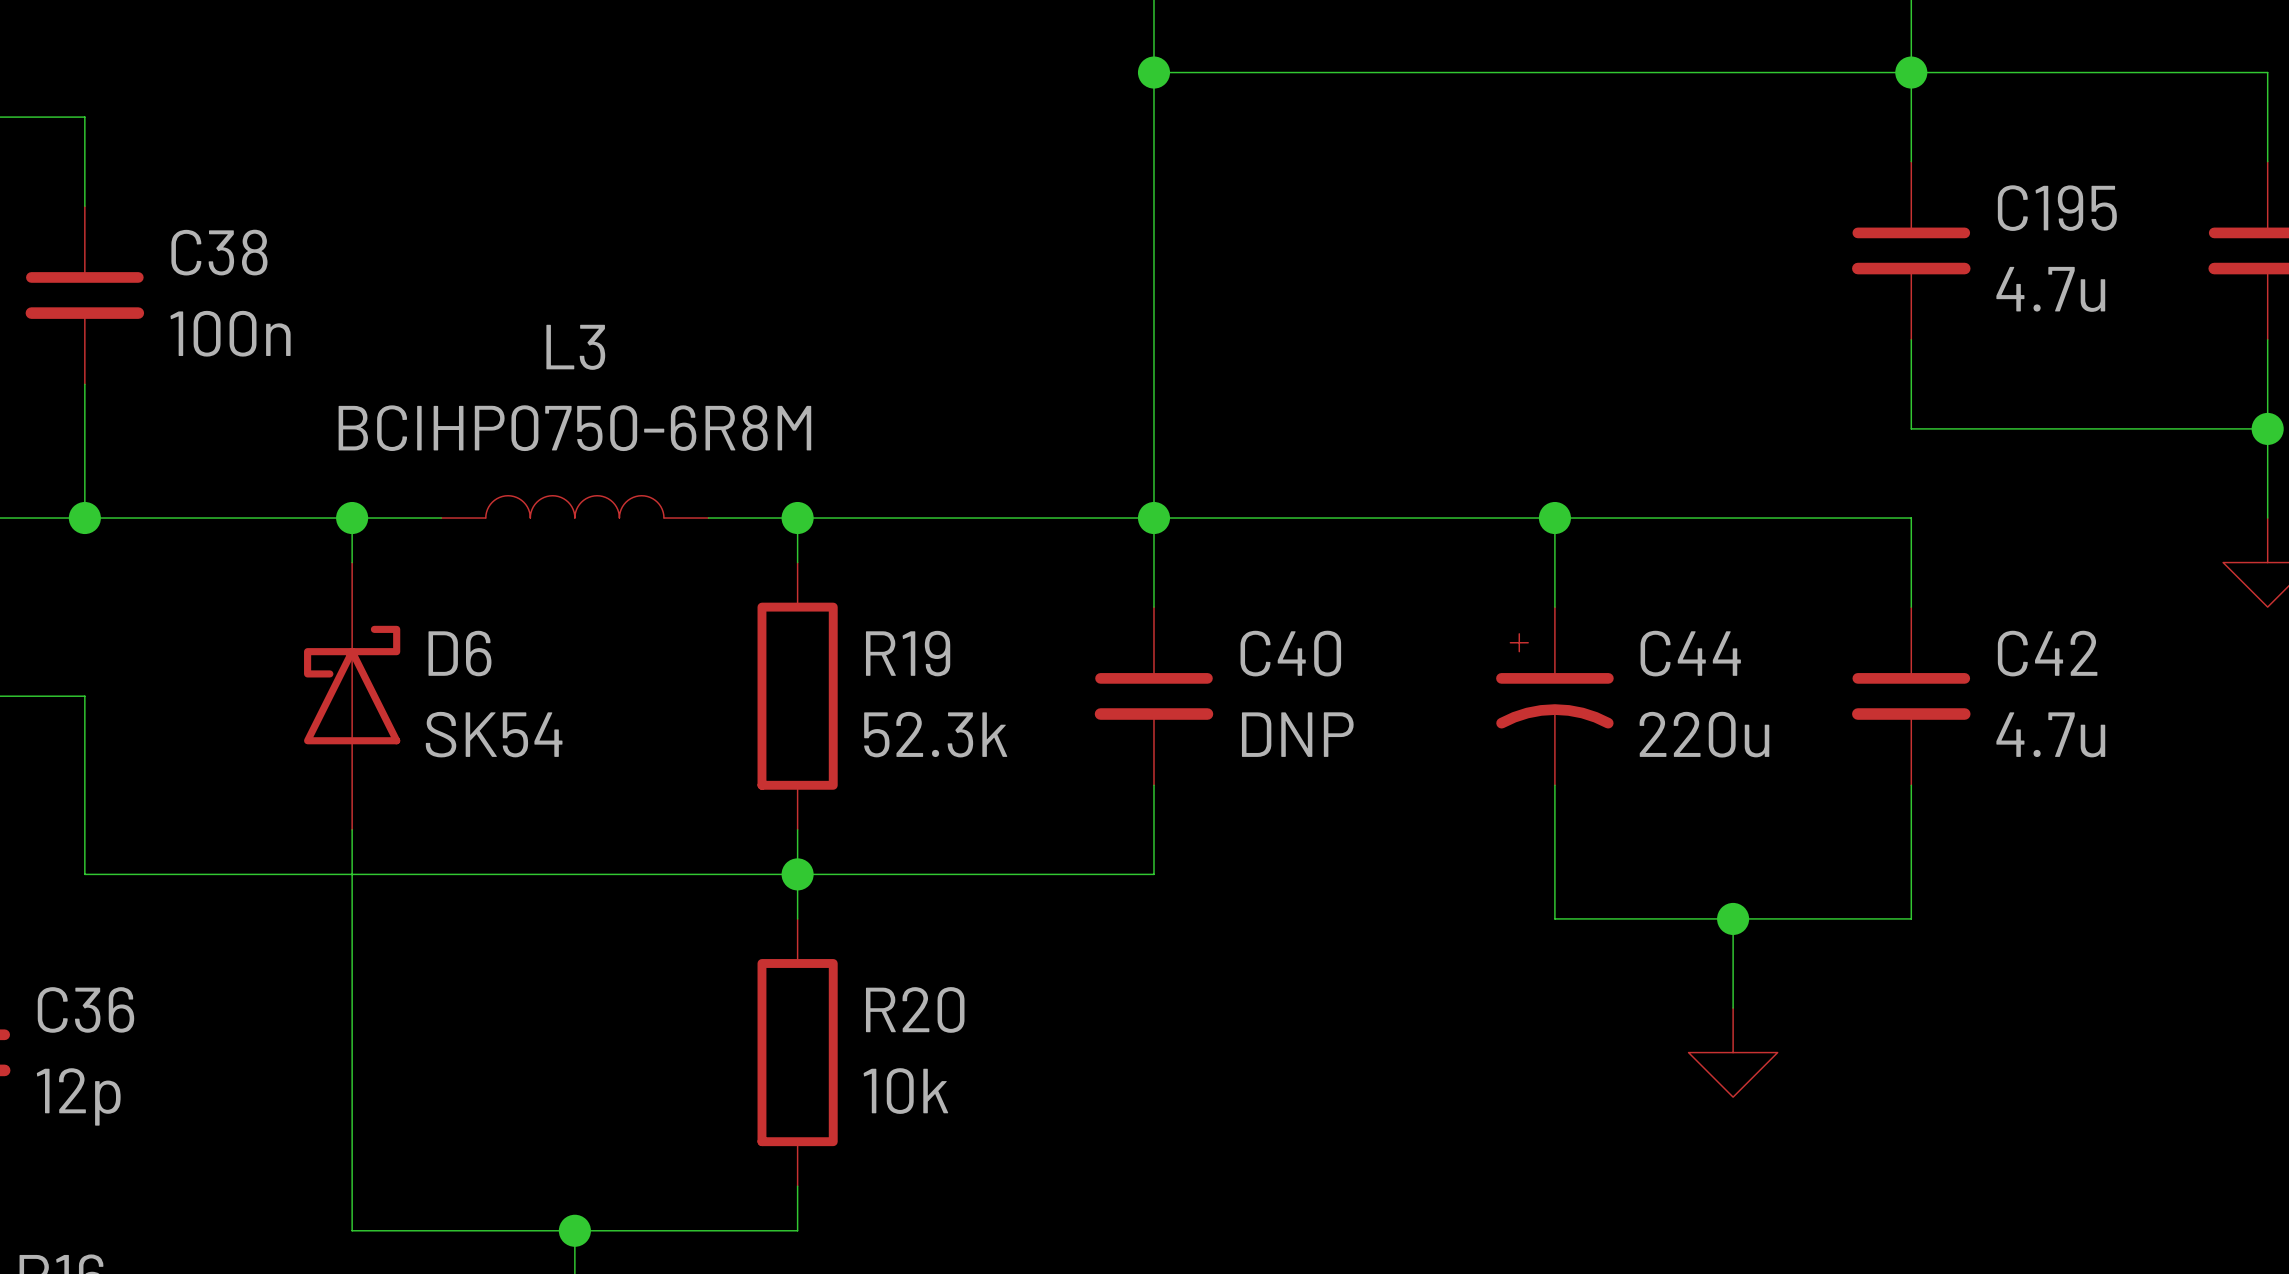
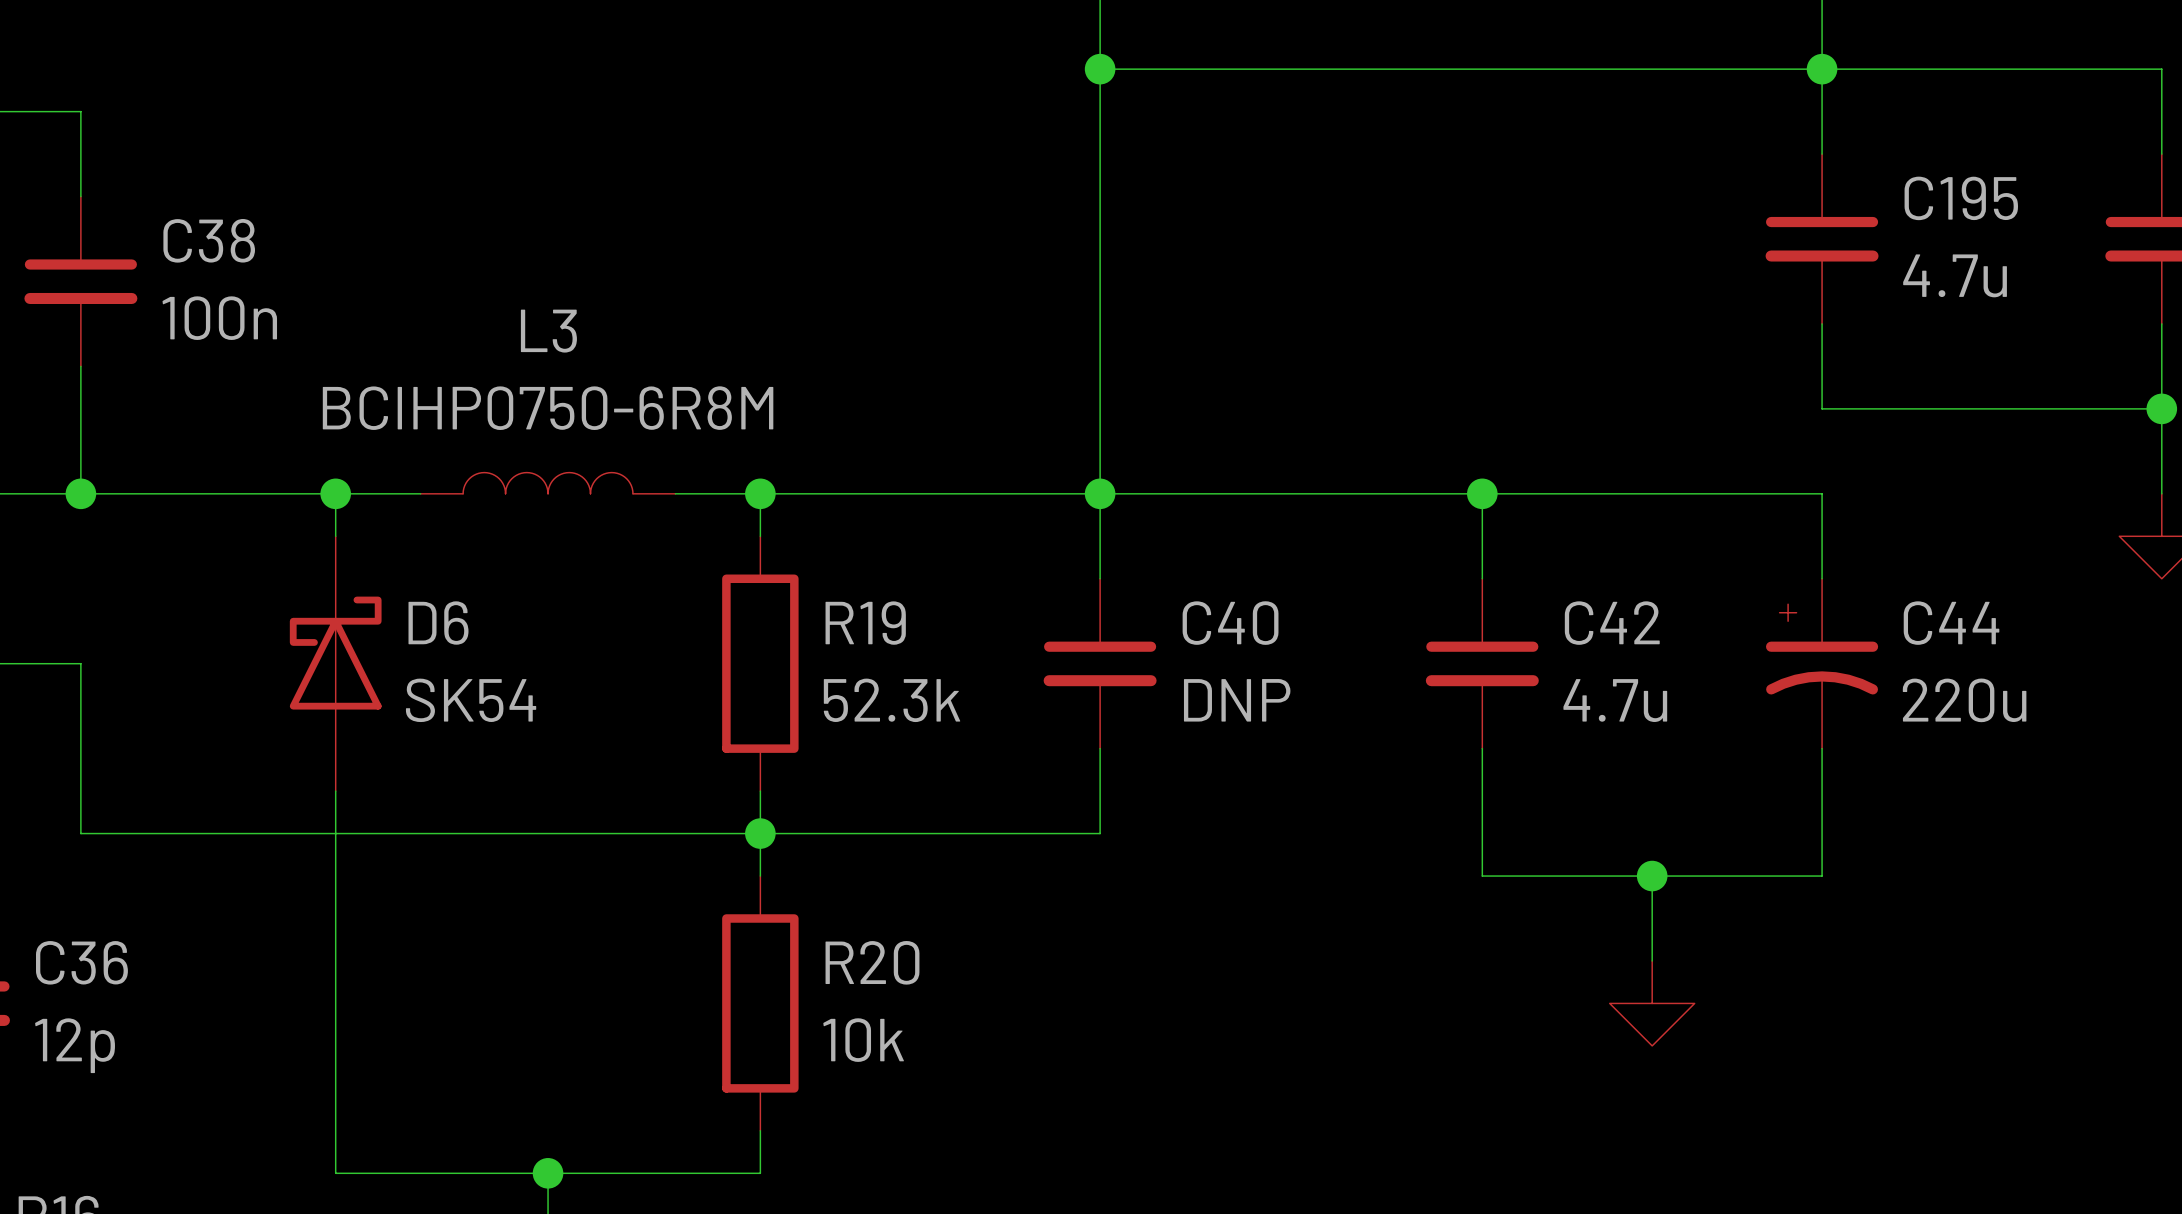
C44 position: (1554, 696) -> (1822, 663)
C42 position: (1911, 696) -> (1482, 663)

